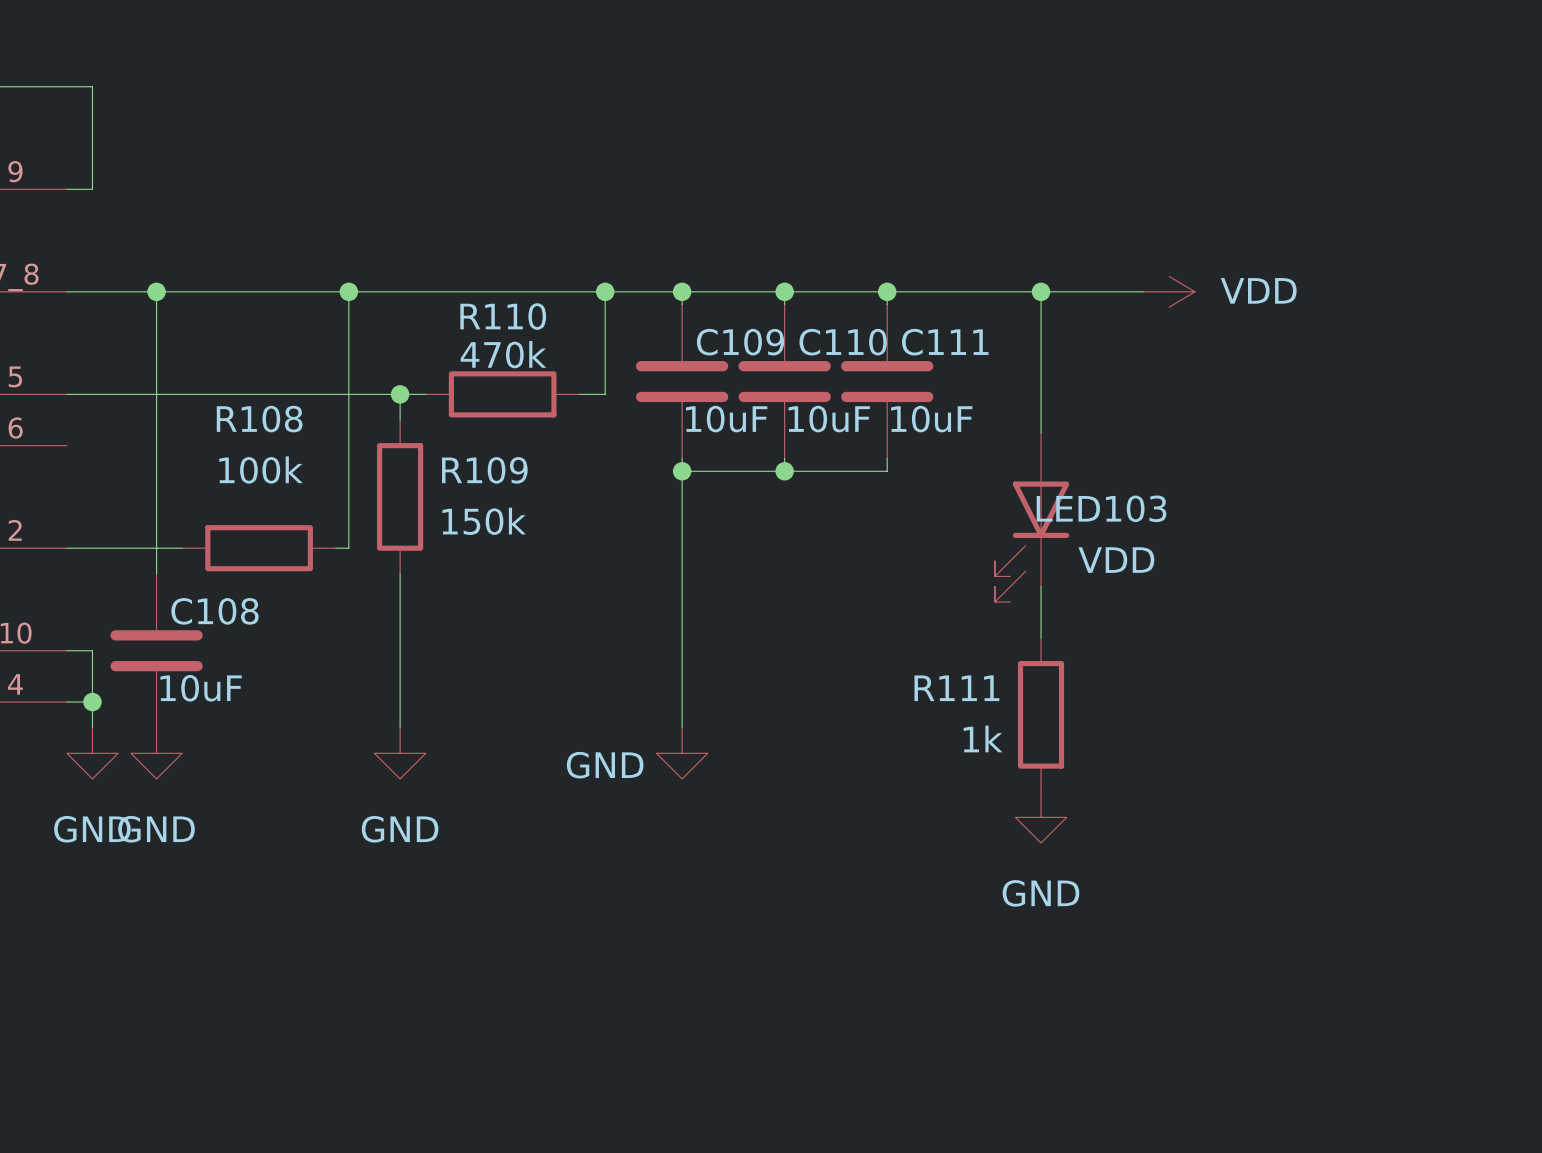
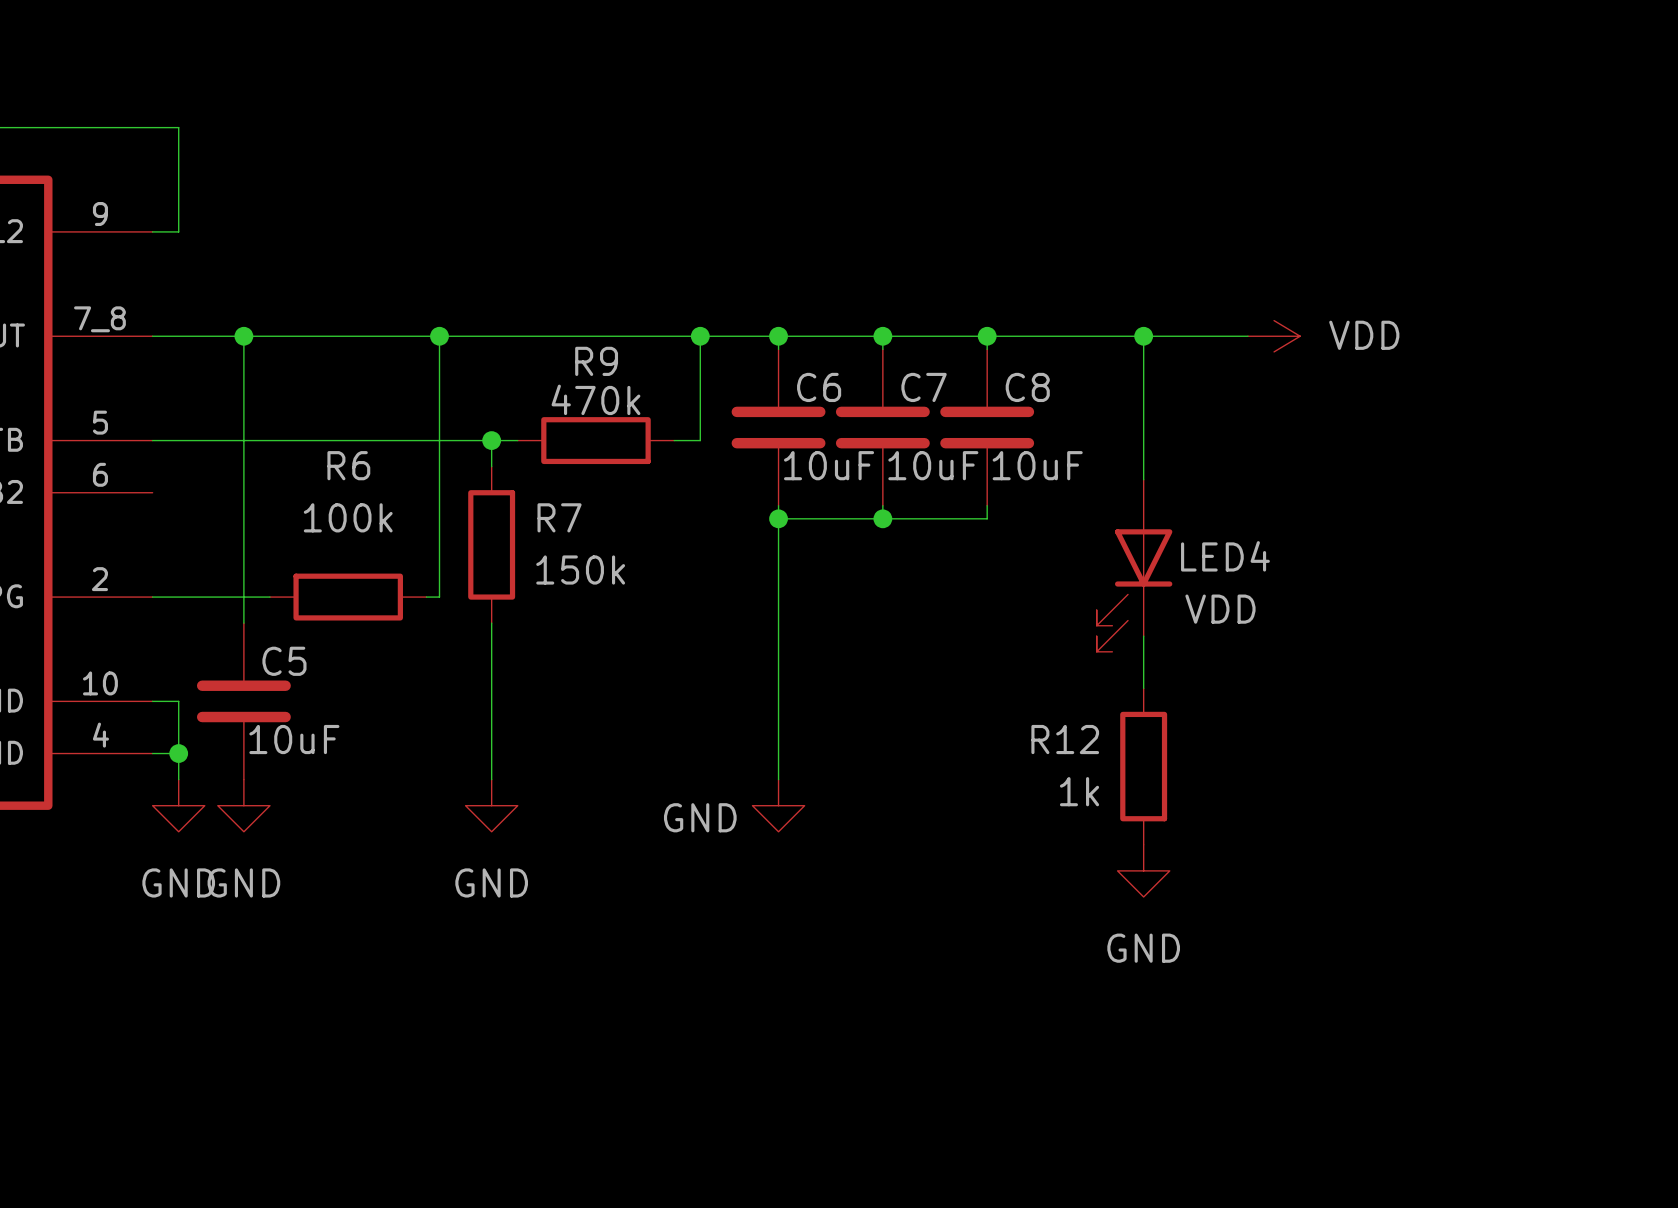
R110 name: R110 (503, 316) -> R9 (596, 361)
C109 name: C109 (740, 342) -> C6 (819, 387)
C110 name: C110 (843, 342) -> C7 (924, 387)
C111 name: C111 (945, 342) -> C8 (1027, 387)
R108 name: R108 (259, 419) -> R6 (348, 465)
R109 name: R109 (484, 470) -> R7 (559, 517)
LED103 name: LED103 (1101, 508) -> LED4 (1225, 556)
C108 name: C108 (215, 611) -> C5 (284, 661)
R111 name: R111 (956, 688) -> R12 (1065, 739)

